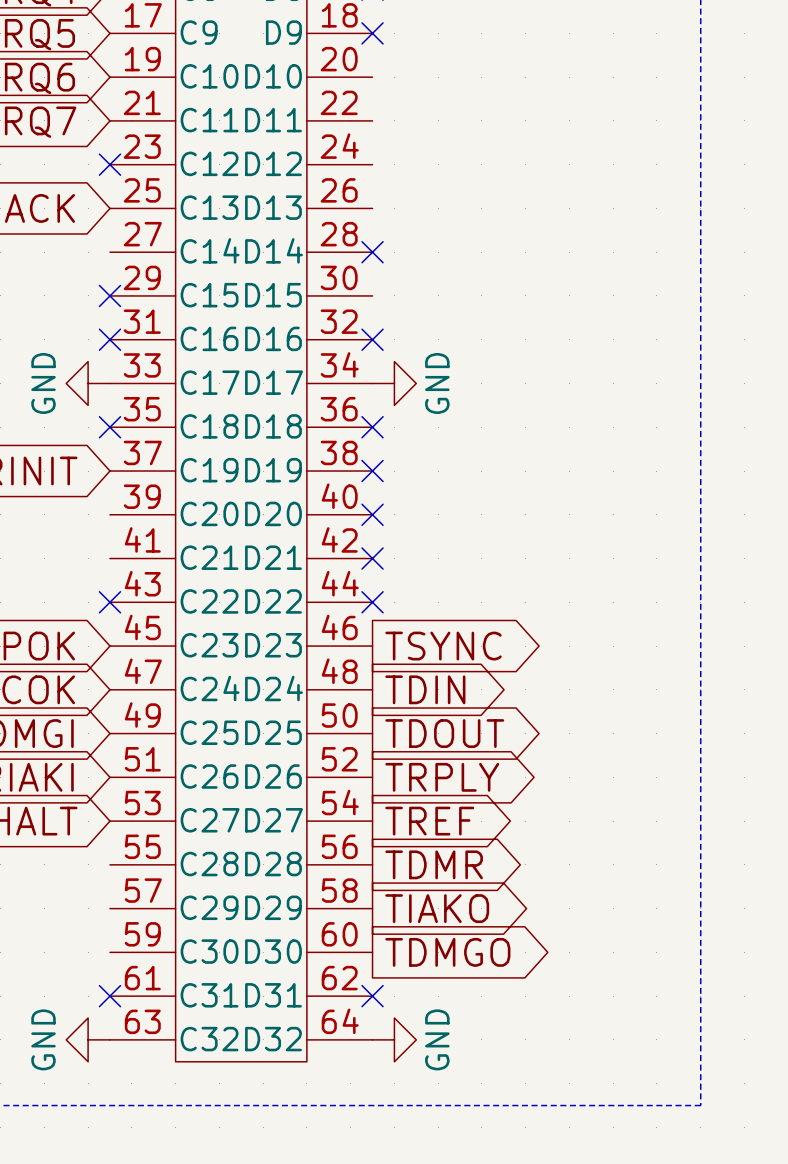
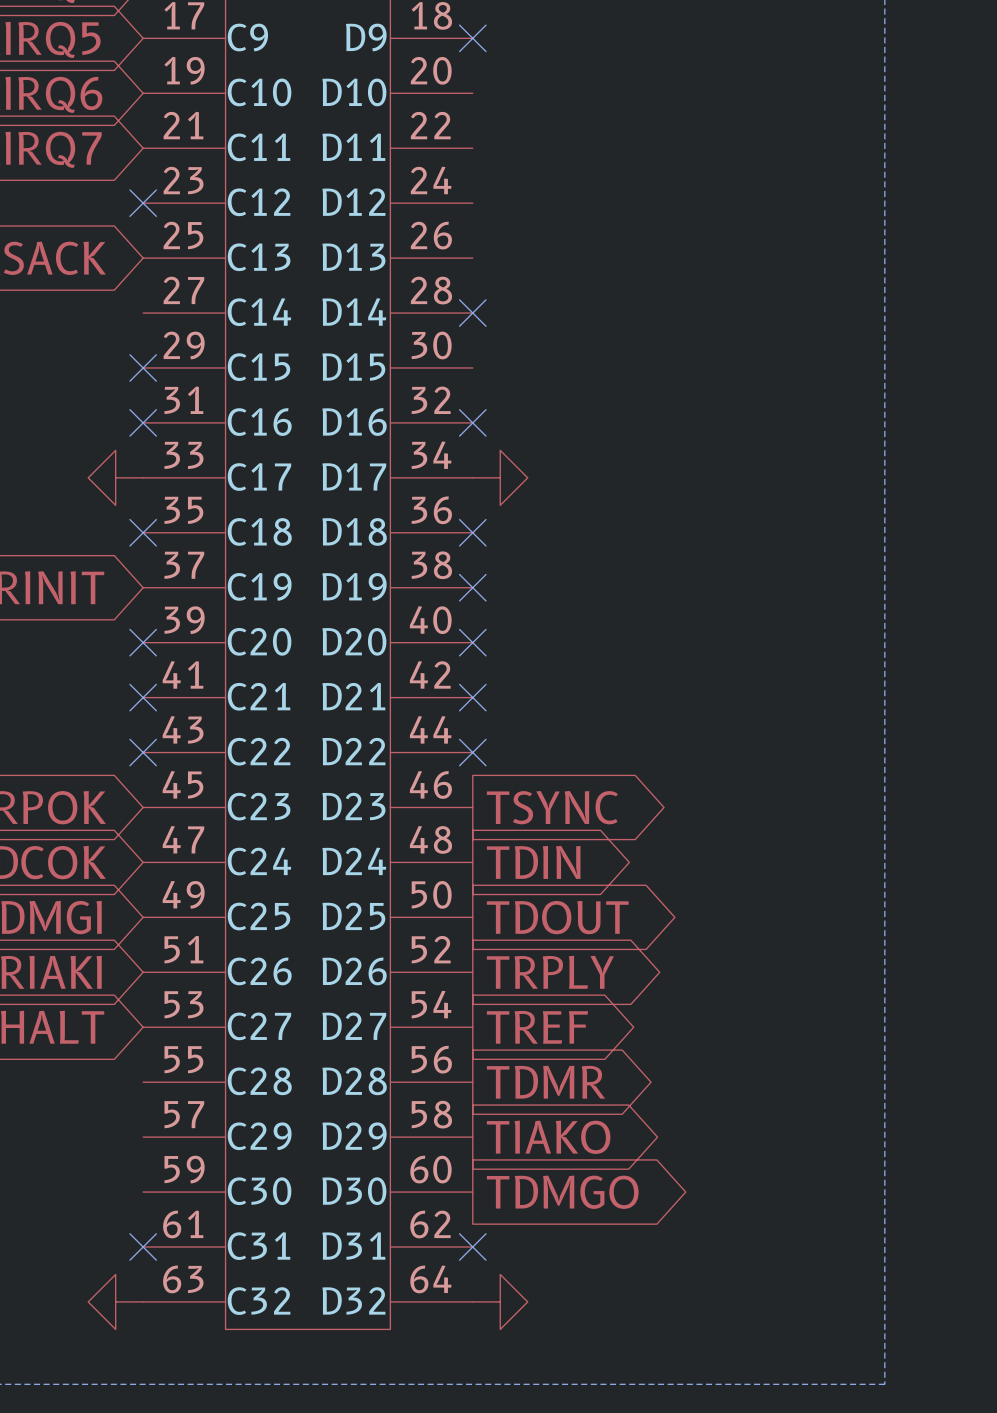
power symbol text: GND (43, 383) -> none
power symbol text: GND (437, 383) -> none
no-connect mark: none -> (143, 642)
no-connect mark: none -> (143, 697)
power symbol text: GND (43, 1039) -> none
power symbol text: GND (437, 1039) -> none

